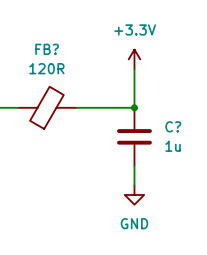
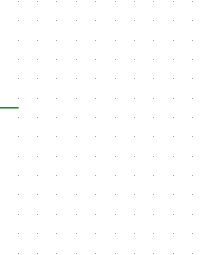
power symbol: +3.3V (134, 59) -> none
wire: (134, 69) (134, 107) (76, 107) -> none
FB?: 120R (47, 107) -> none
junction: (134, 107) -> none
C?: 1u (134, 136) -> none
wire: (134, 165) (134, 185) -> none
power symbol: GND (134, 194) -> none

